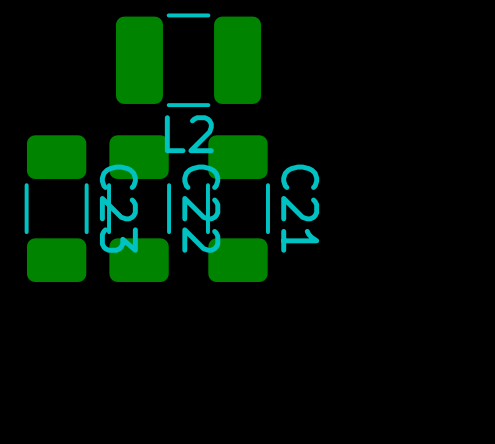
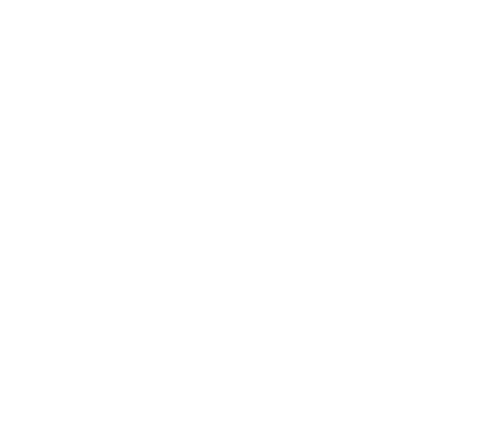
L2: (188, 60) -> none
C23: (56, 208) -> none
C22: (139, 208) -> none
C21: (237, 208) -> none

